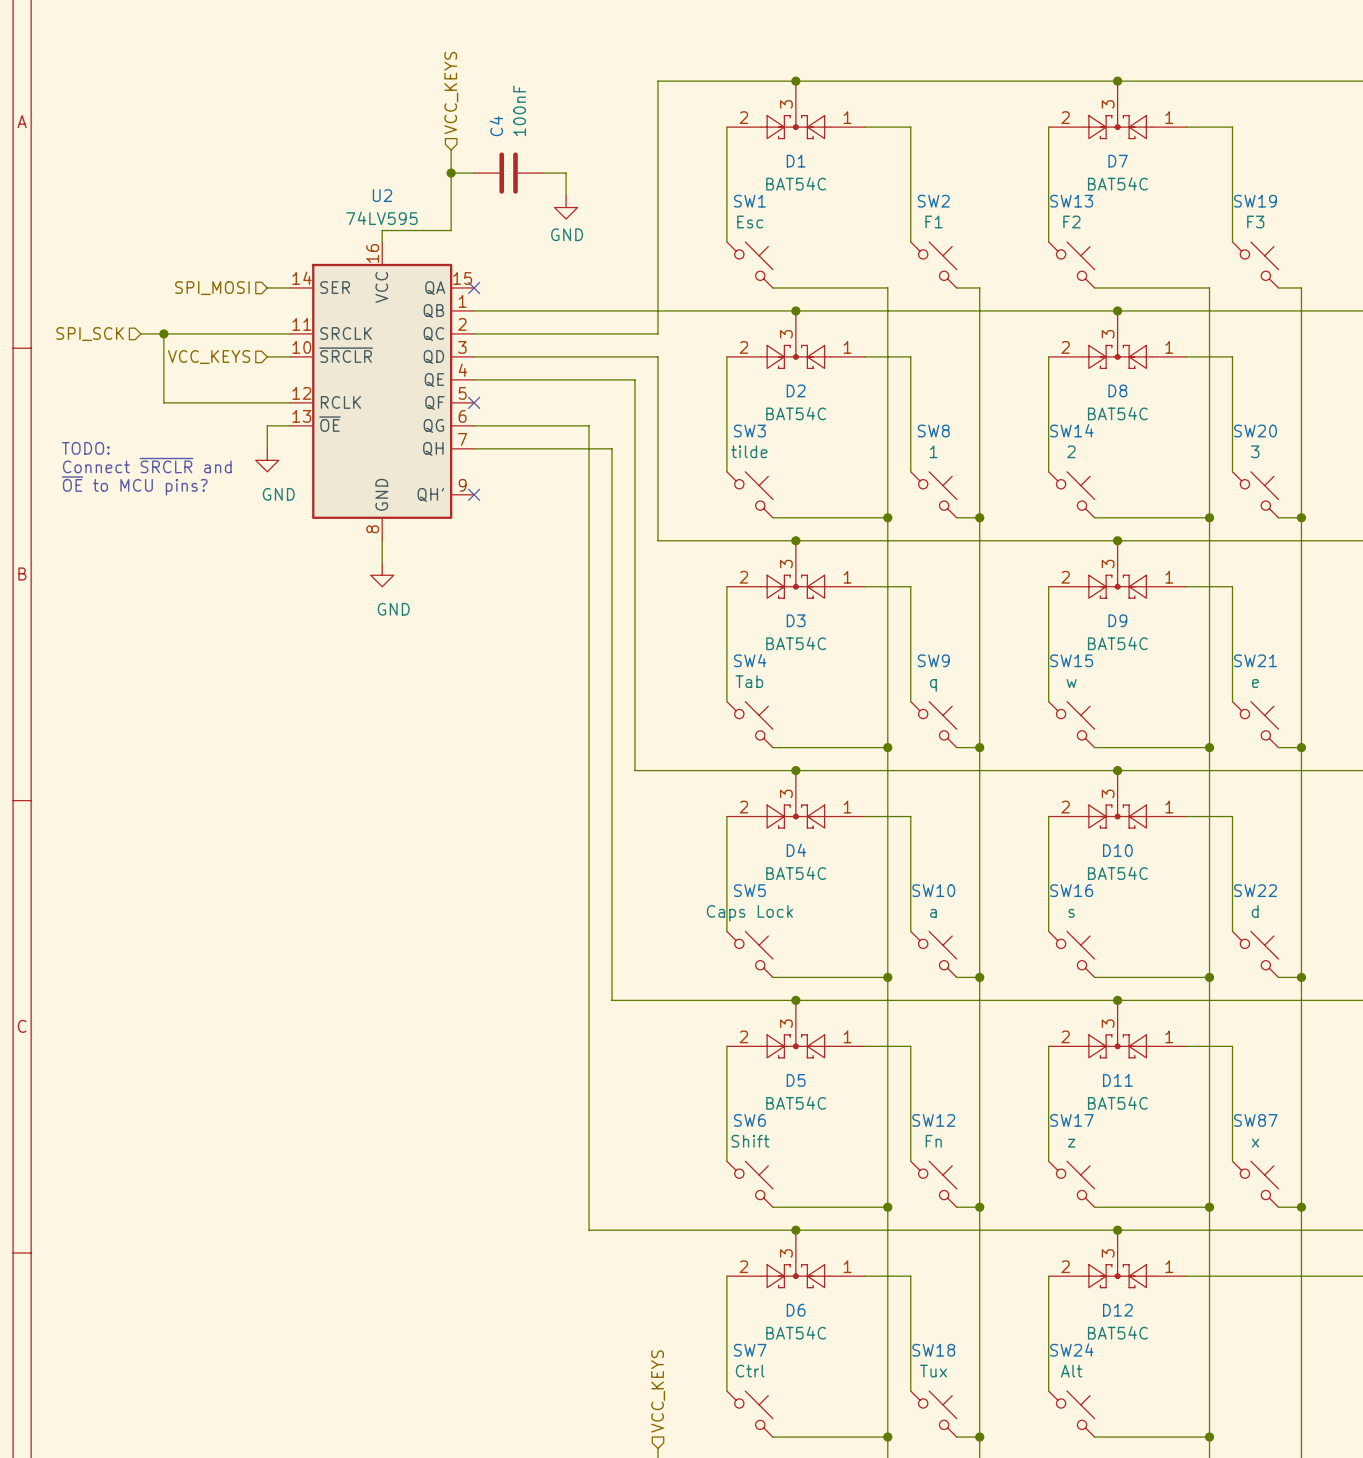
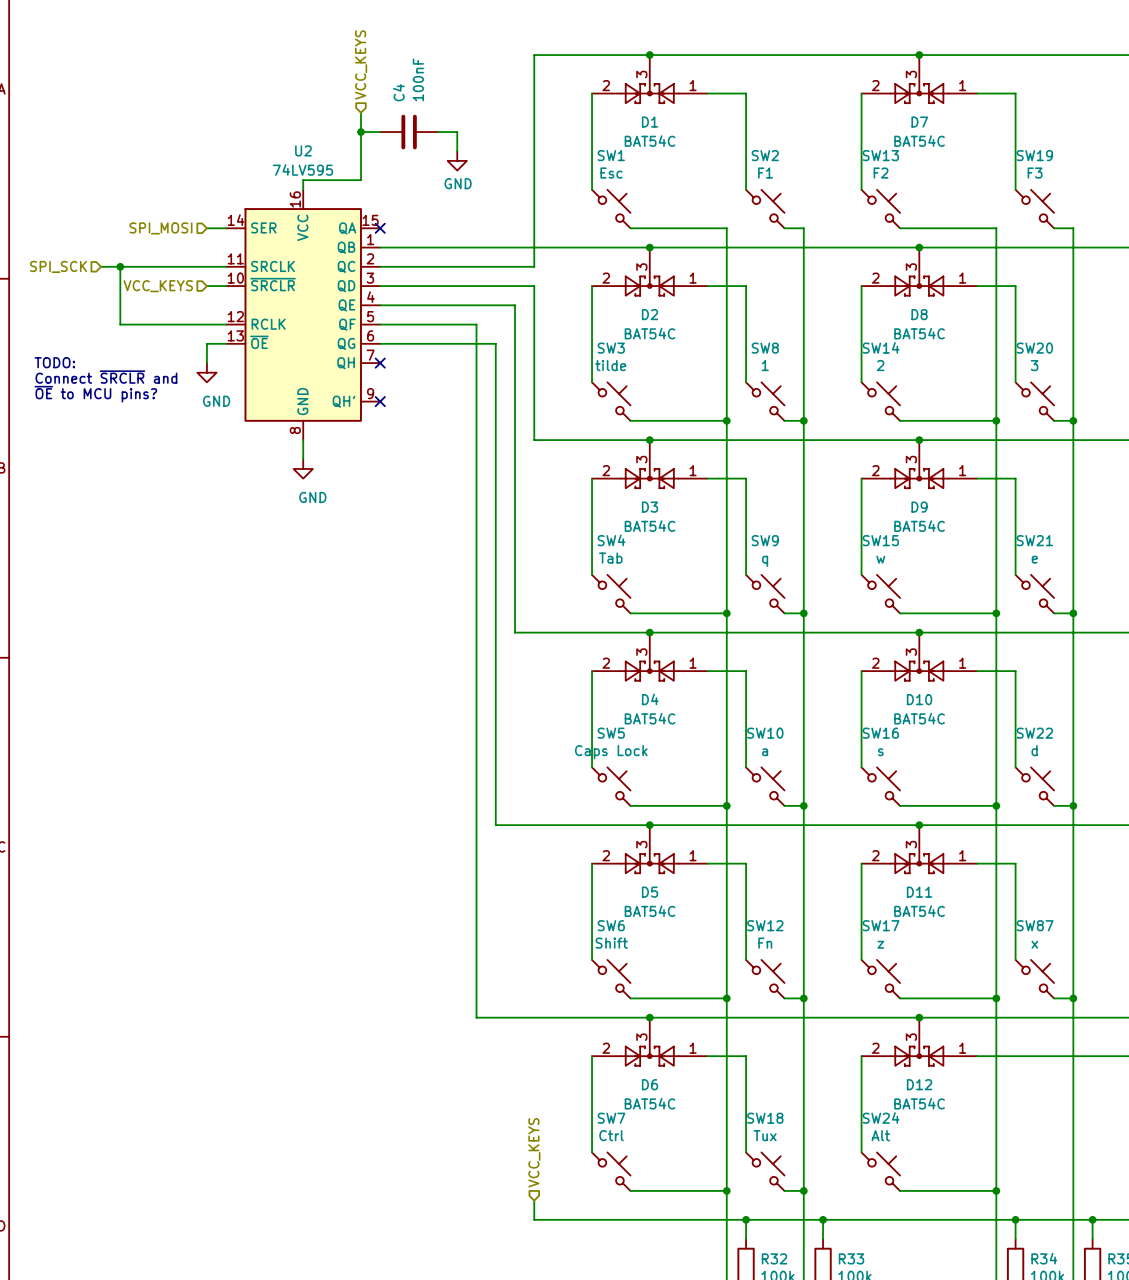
no-connect mark position: (474, 402) -> (380, 363)
wire: (474, 448) (612, 448) -> (380, 324) (476, 324) (476, 343) (495, 343) (495, 363)

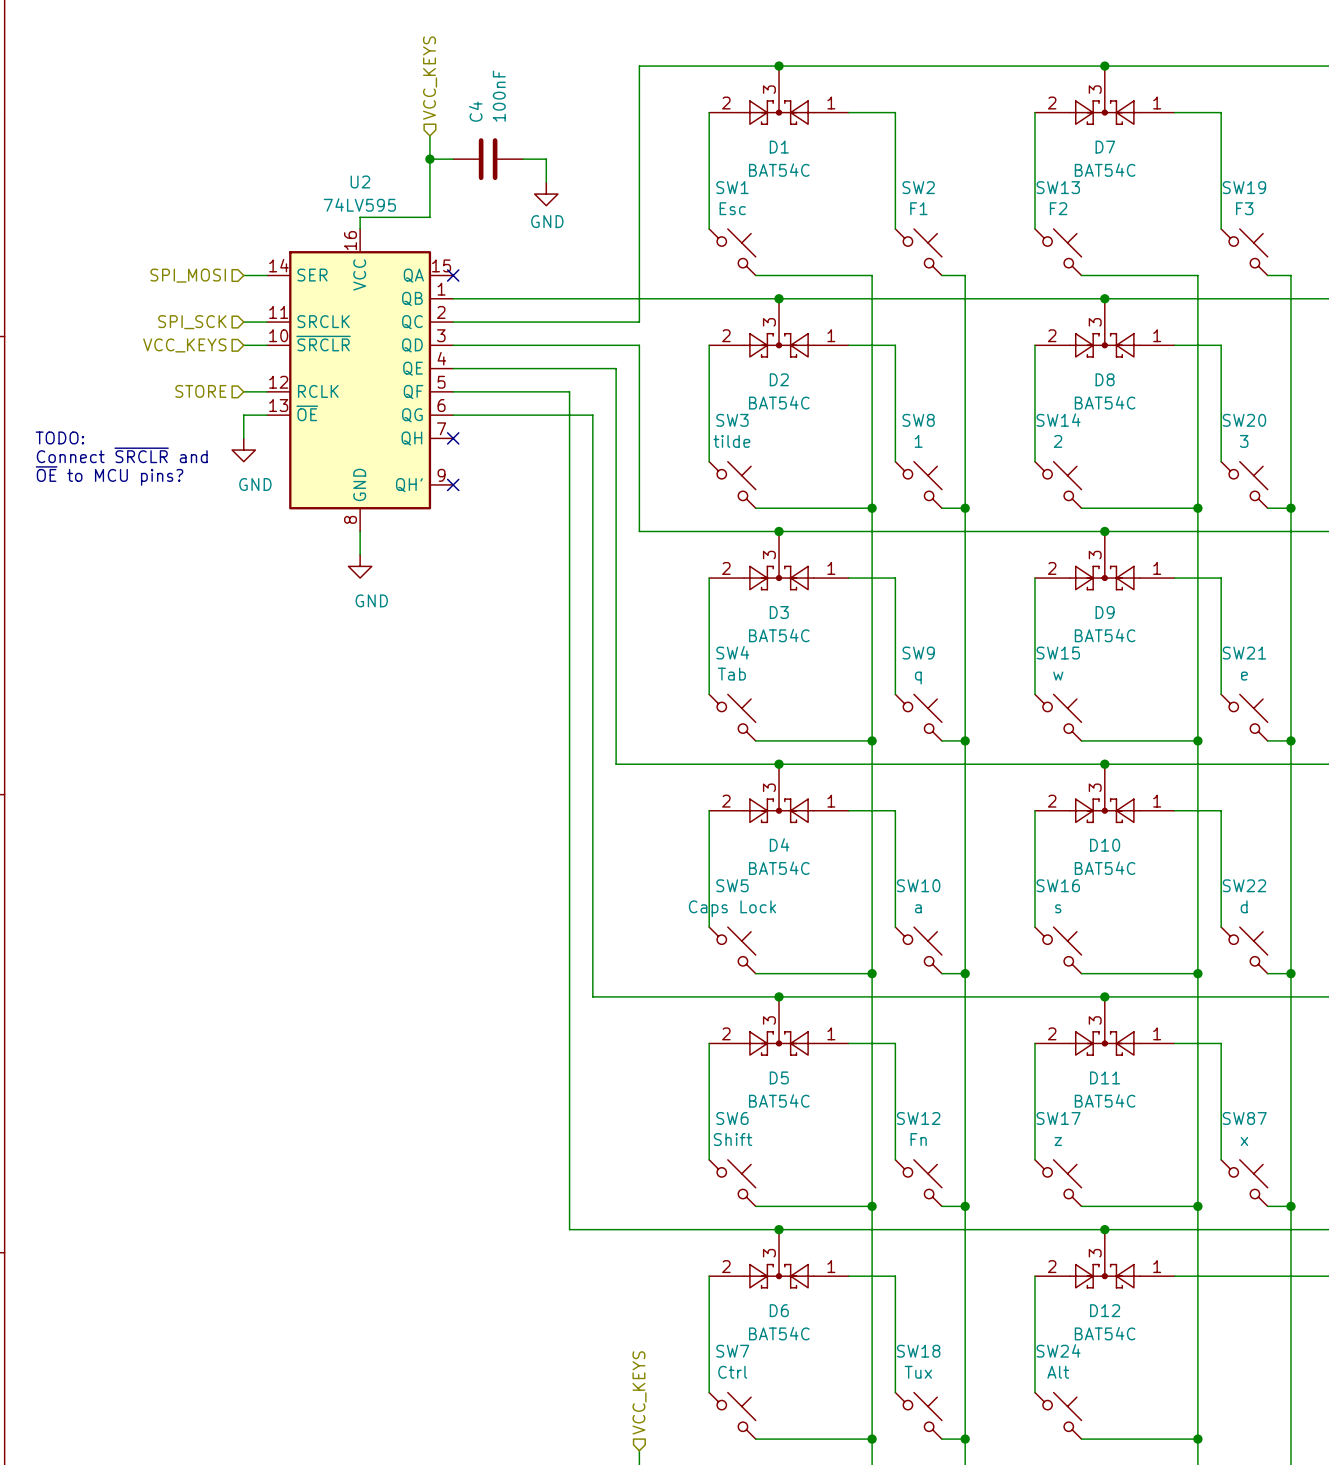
hierarchical label position: SPI_SCK (58, 266) -> SPI_SCK (192, 322)
wire: (101, 266) (206, 266) -> none
wire: (120, 266) (120, 324) (206, 324) -> none
junction: (120, 266) -> none
hierarchical label: none -> STORE (200, 391)

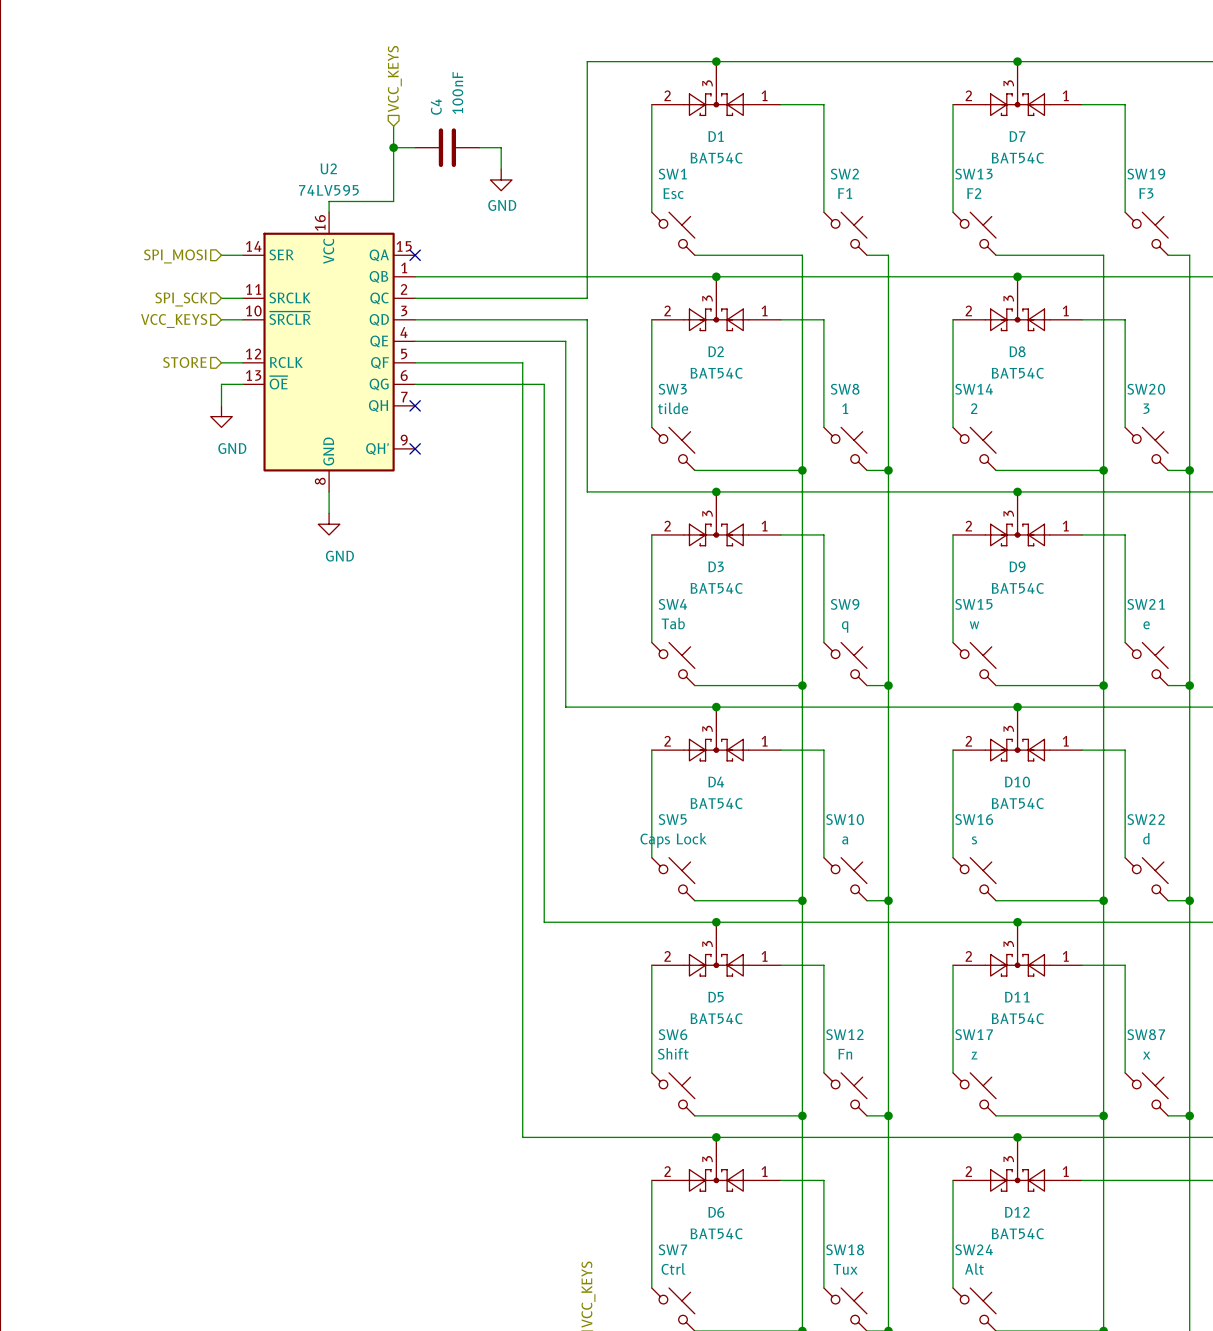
text: TODO: (59, 437) -> none
text: Connect ~{SRCLR} and (122, 455) -> none
text: ~{OE} to MCU pins? (109, 476) -> none

